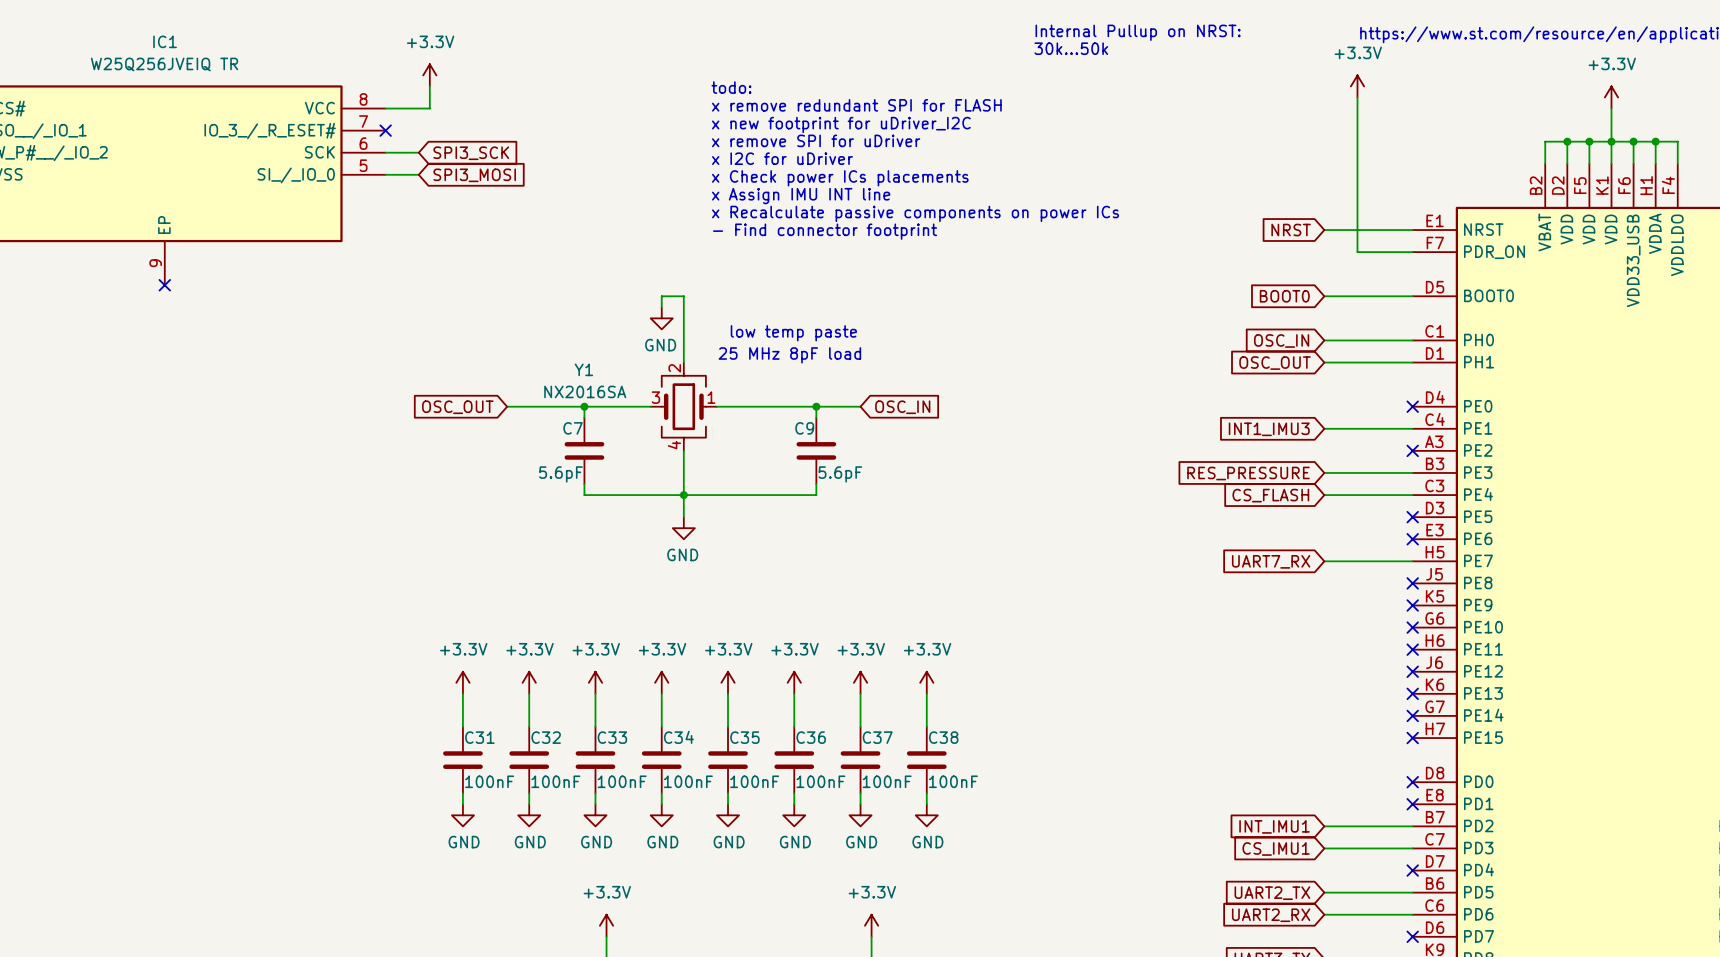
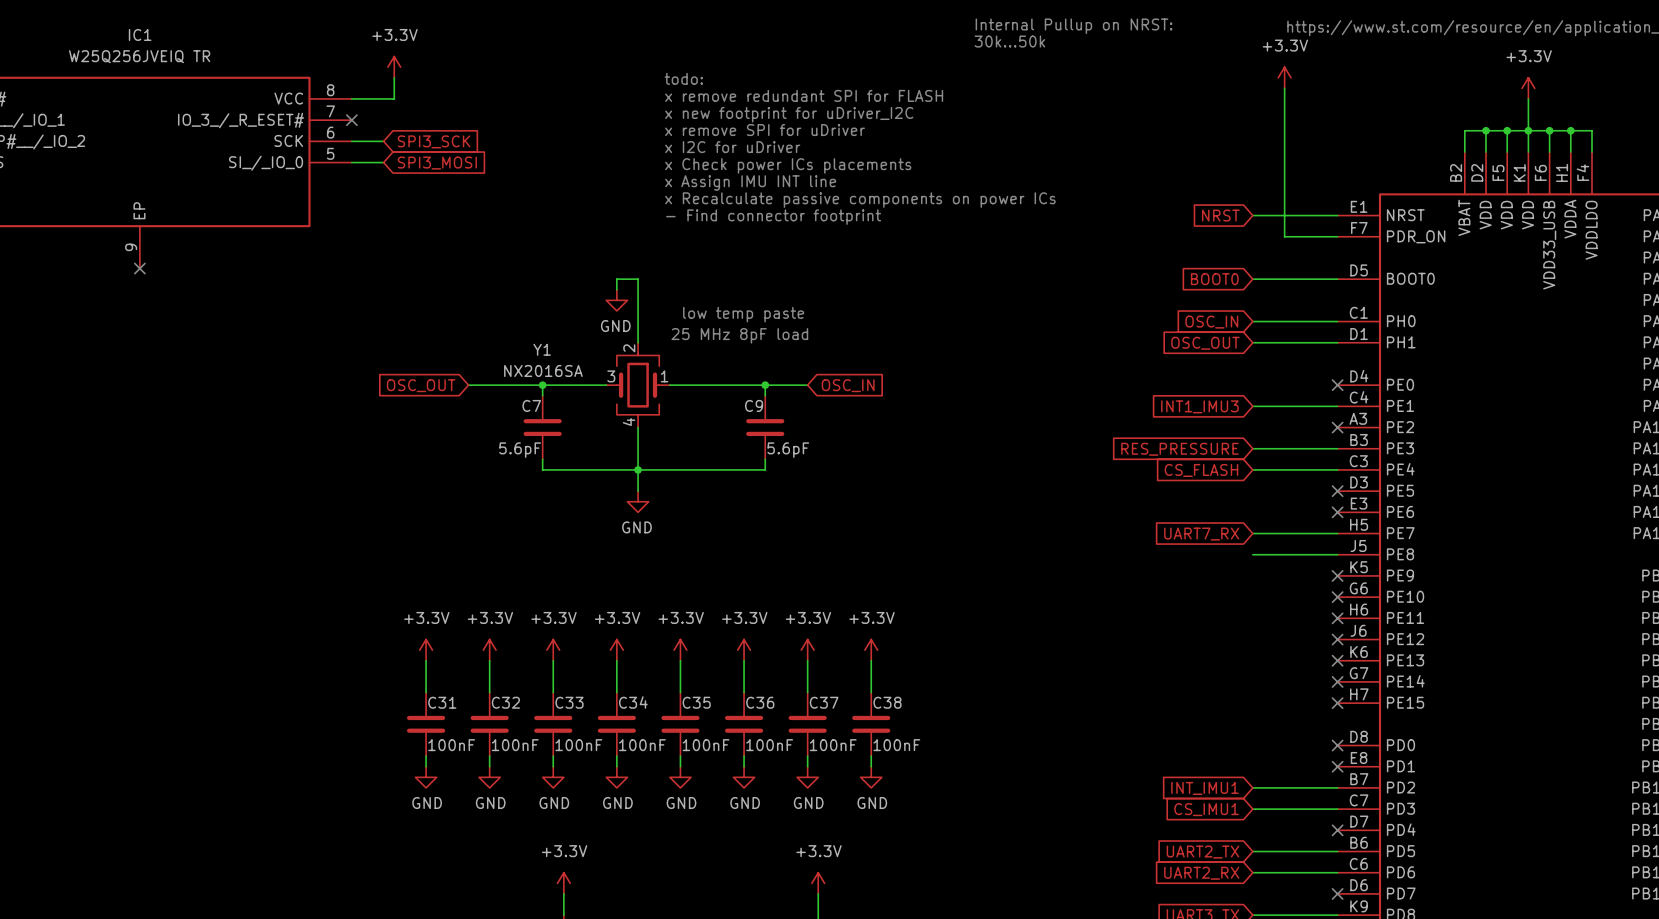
wire: none -> (1252, 554) (1337, 554)
no-connect mark: (1412, 583) -> none

